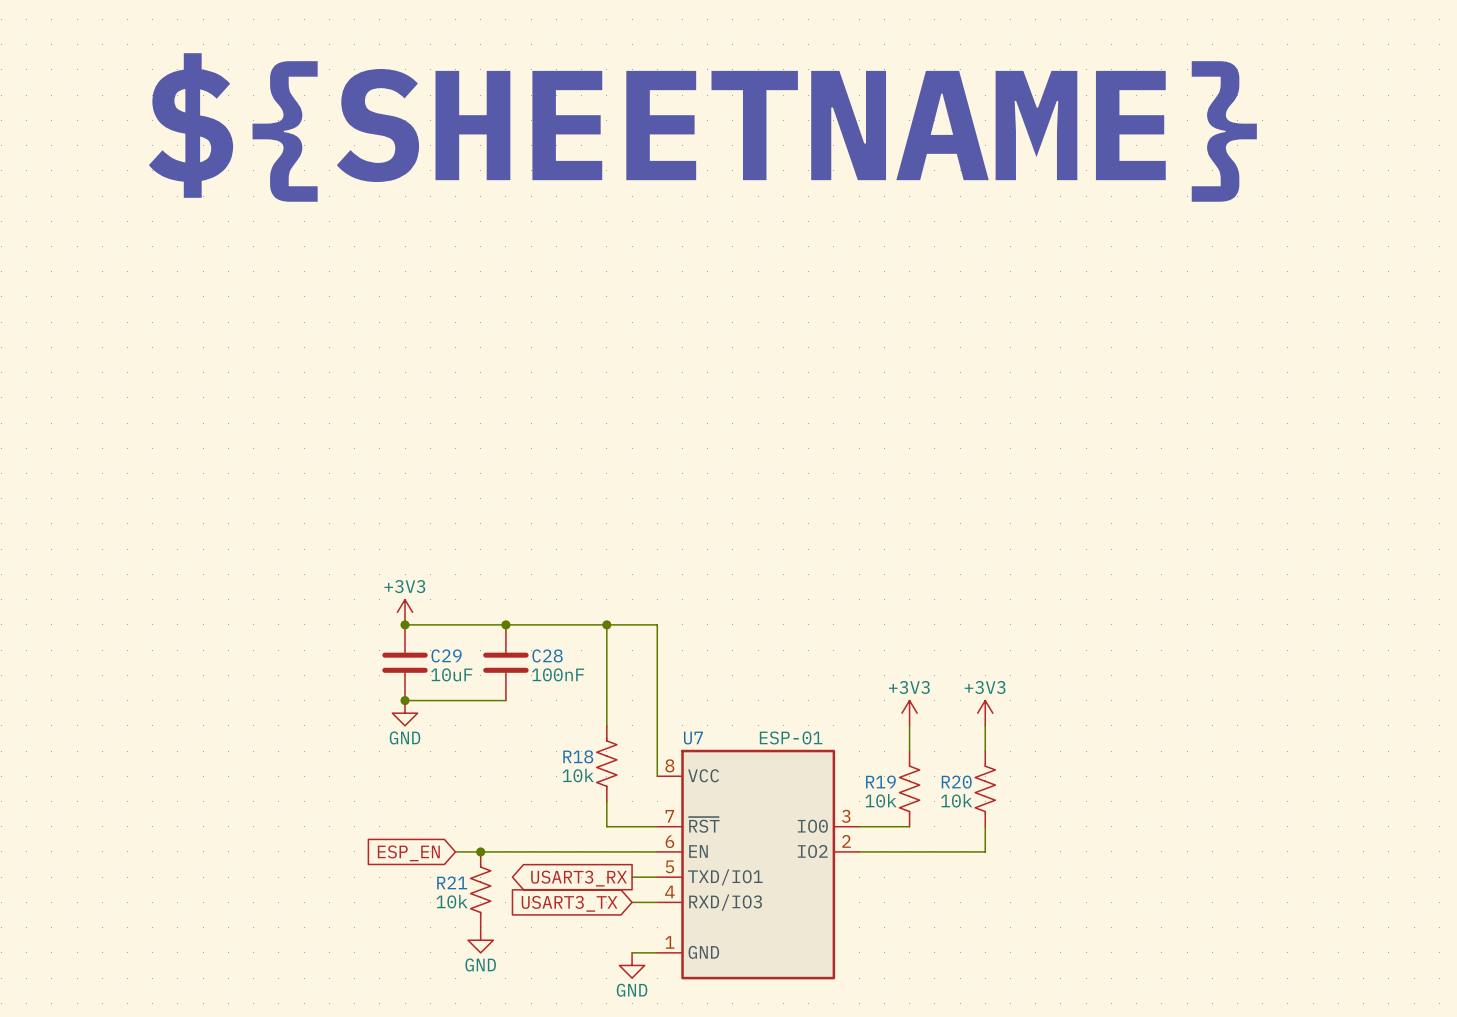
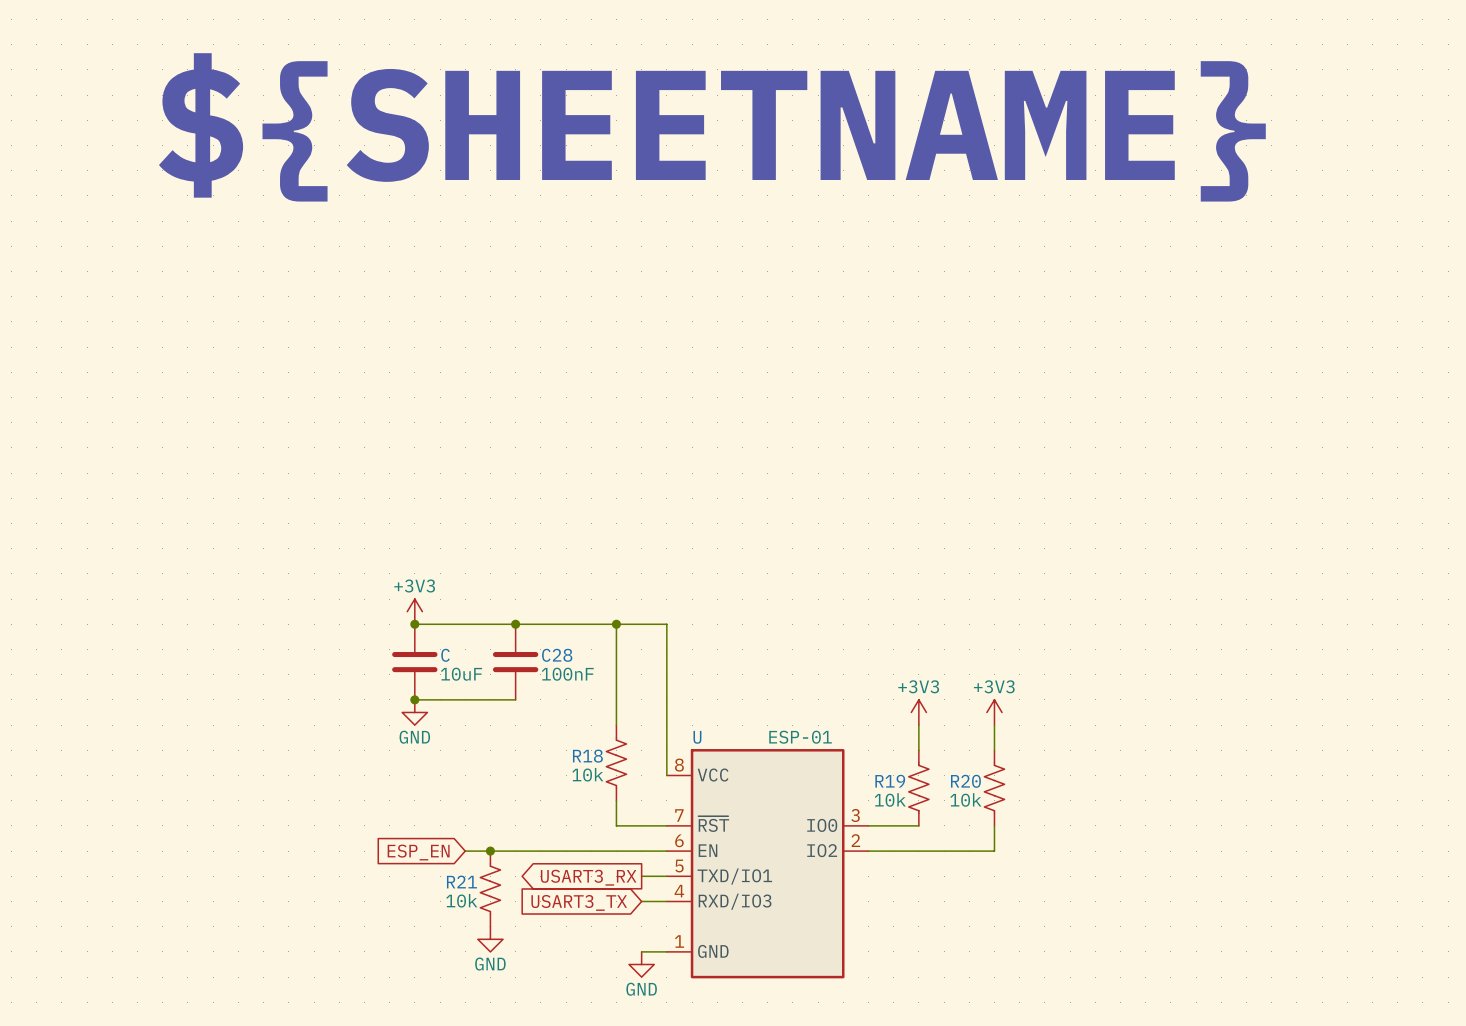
C29 name: C29 (446, 655) -> C (445, 655)
U7 name: U7 (693, 738) -> U (697, 737)

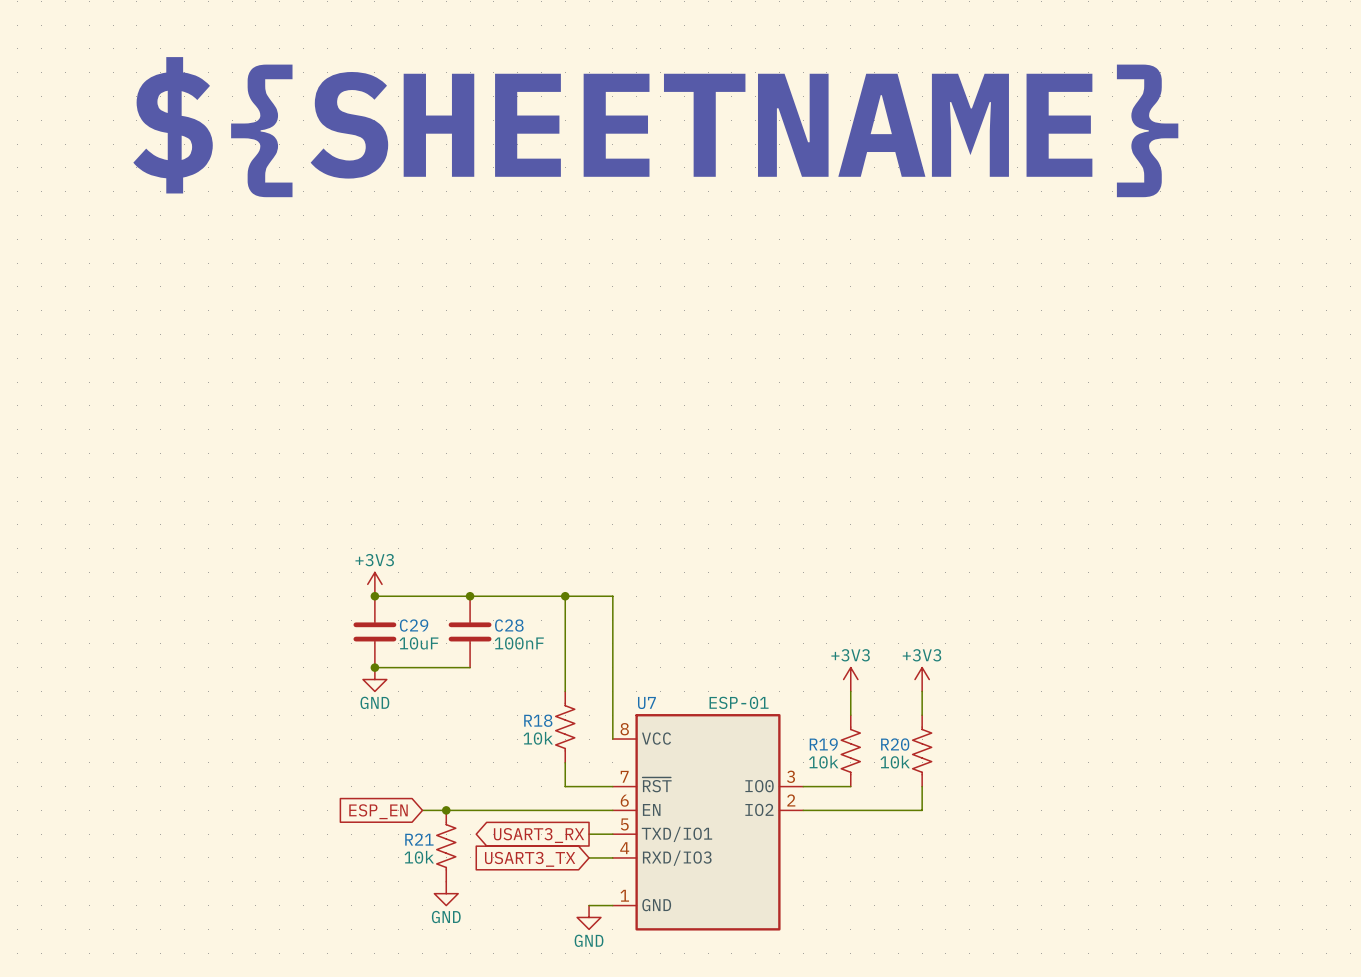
C name: C (445, 655) -> C29 (414, 625)
U name: U (697, 737) -> U7 (646, 702)

